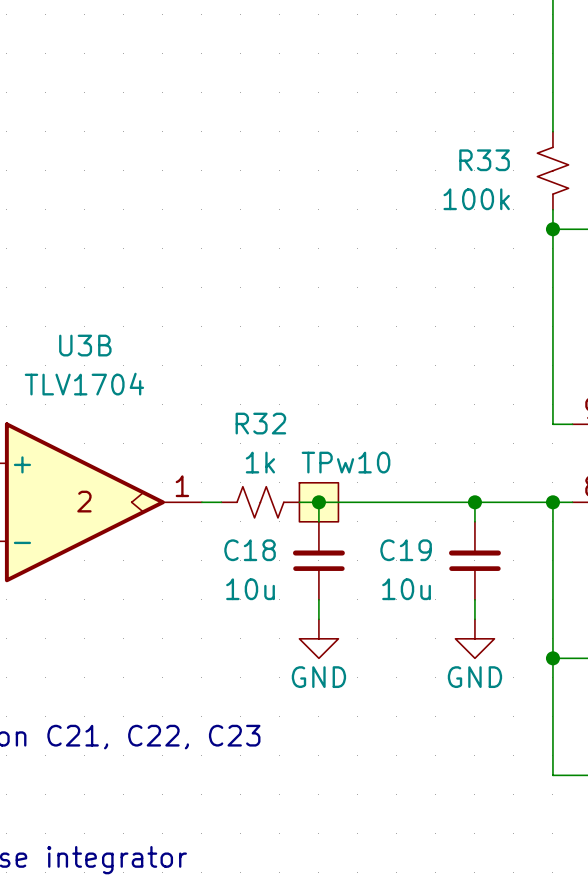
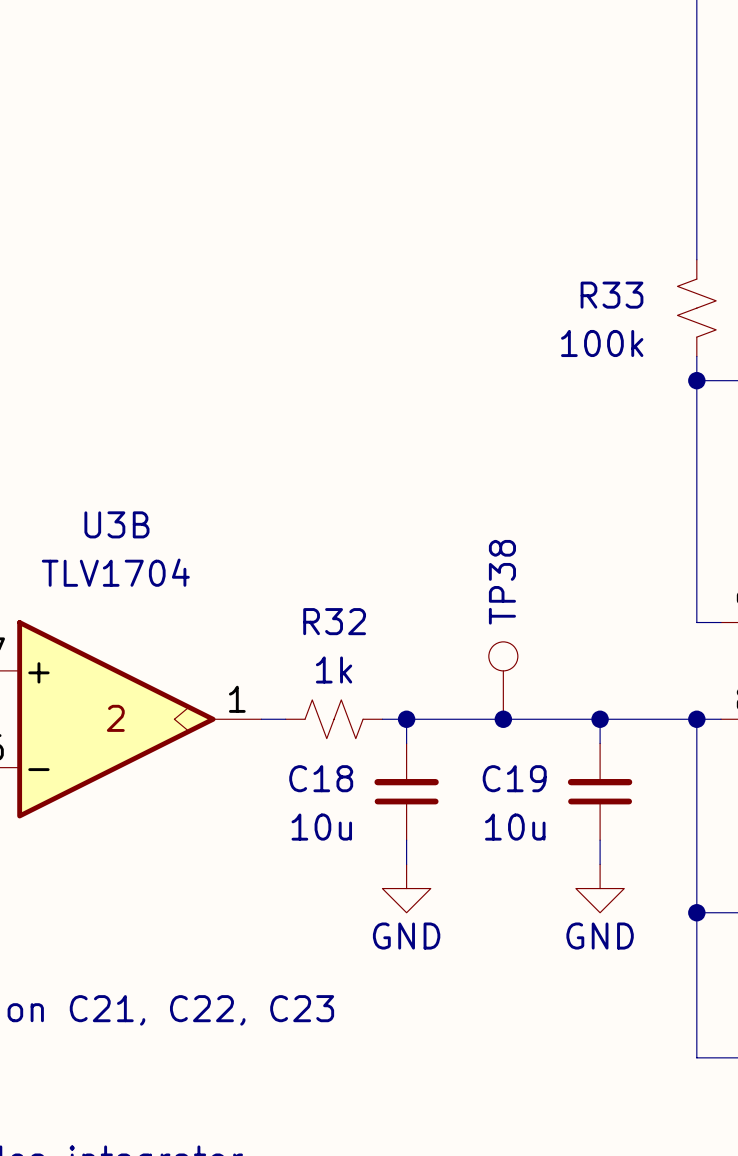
TP38: none -> (503, 680)
TPw10: (318, 502) -> none
junction: none -> (503, 719)

